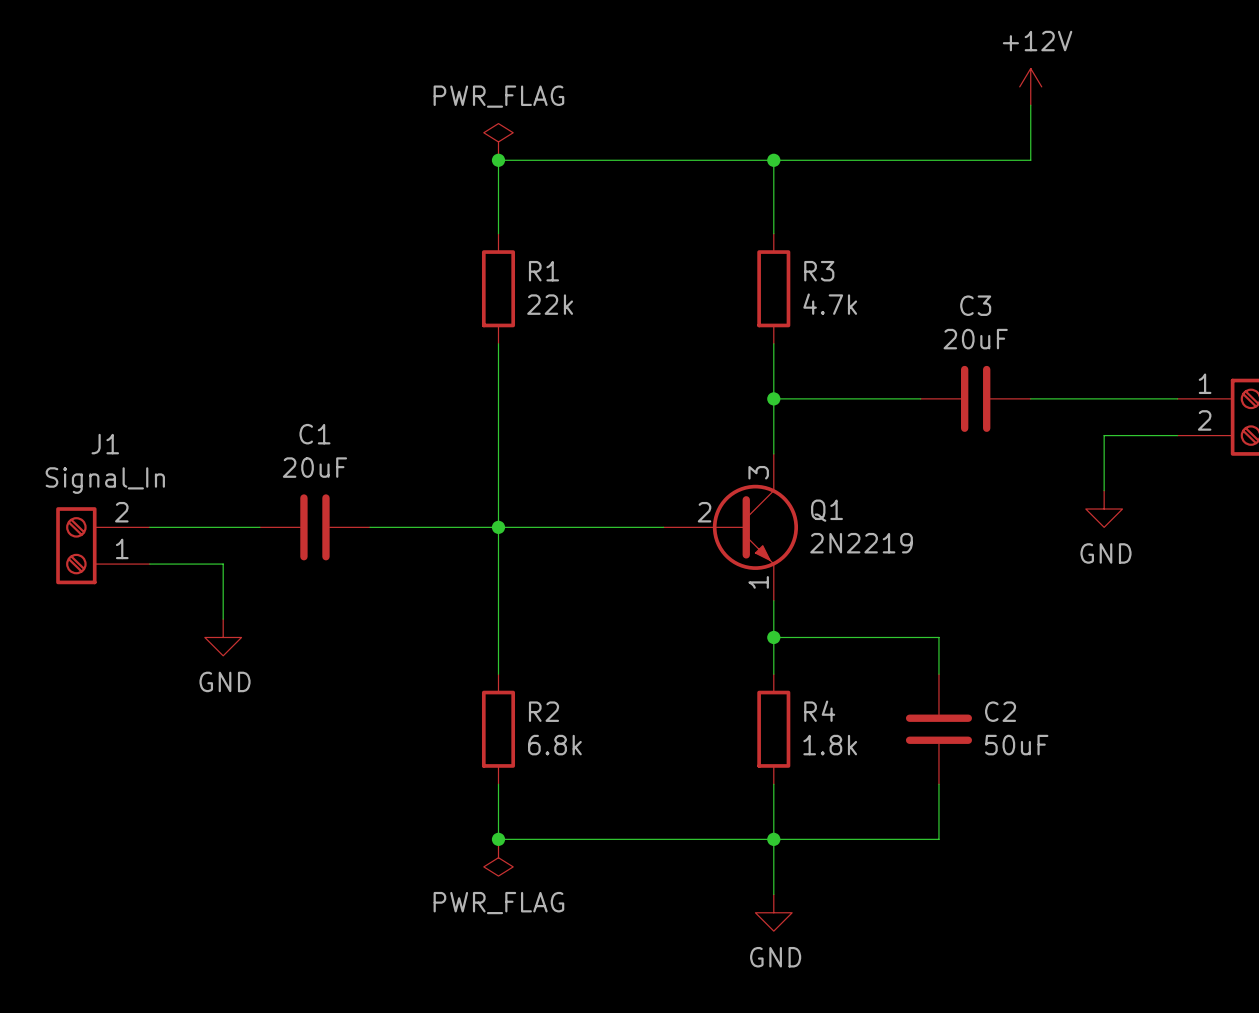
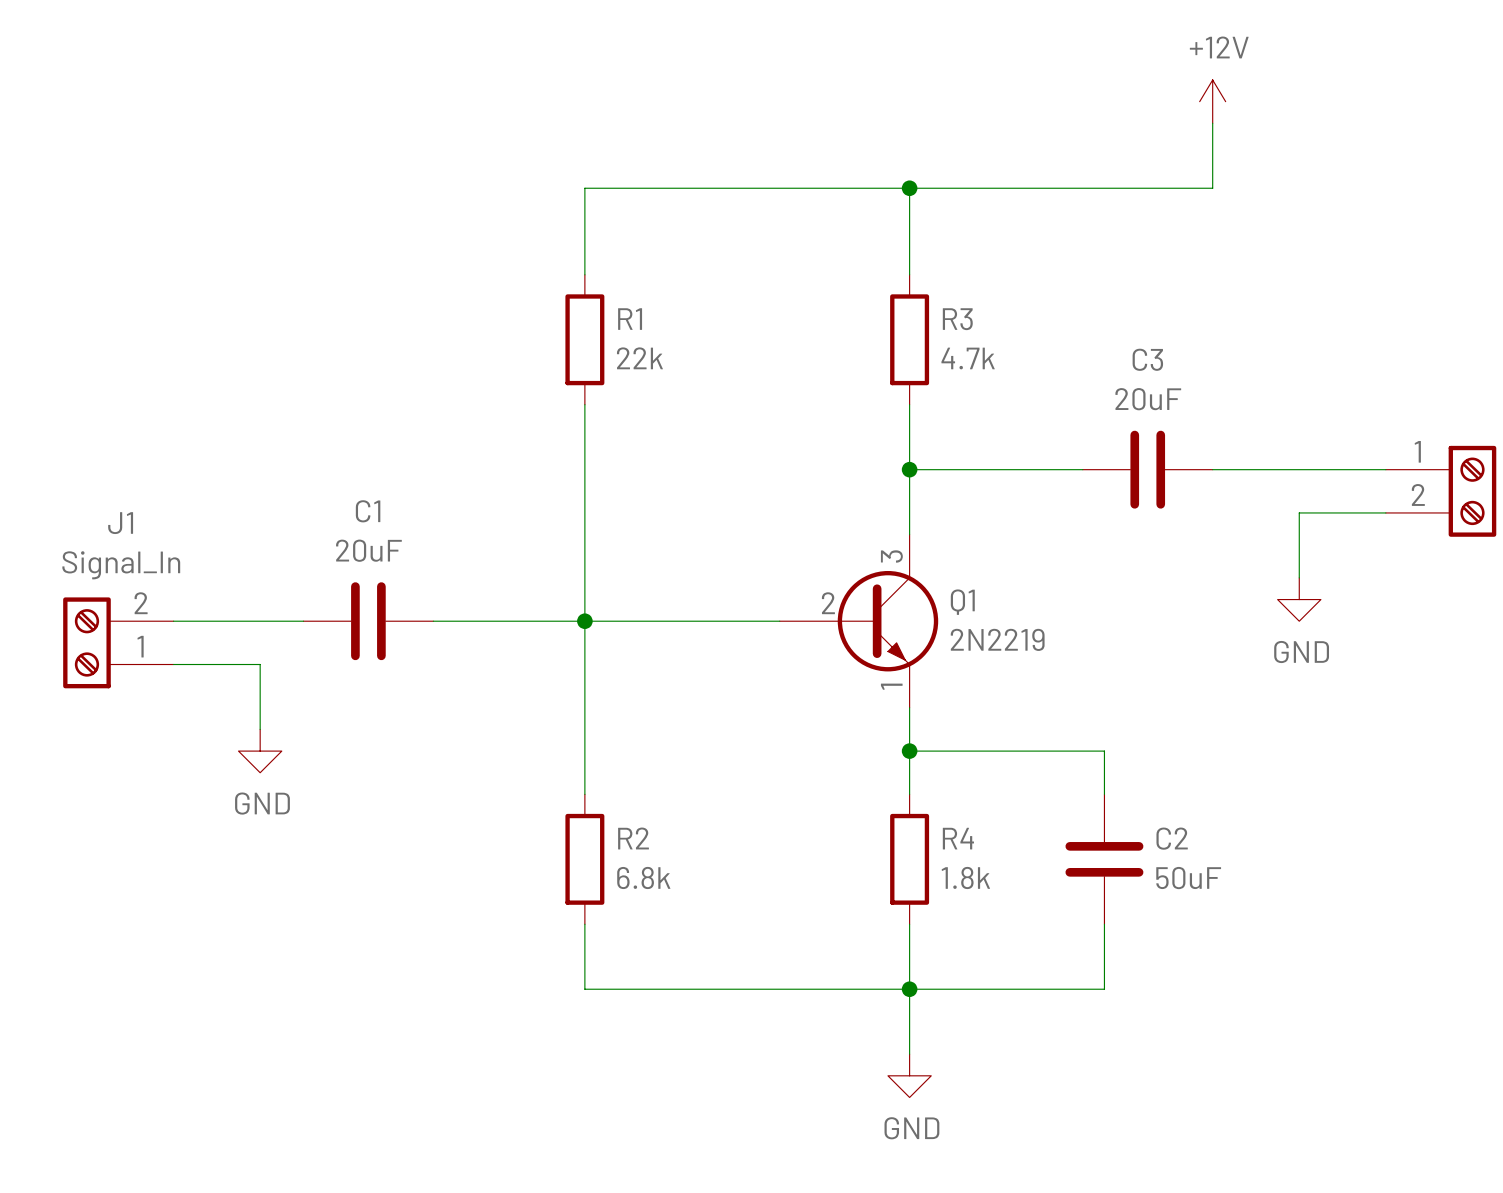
power symbol: PWR_FLAG (498, 141) -> none
junction: (498, 160) -> none
junction: (498, 839) -> none
power symbol: PWR_FLAG (498, 857) -> none

